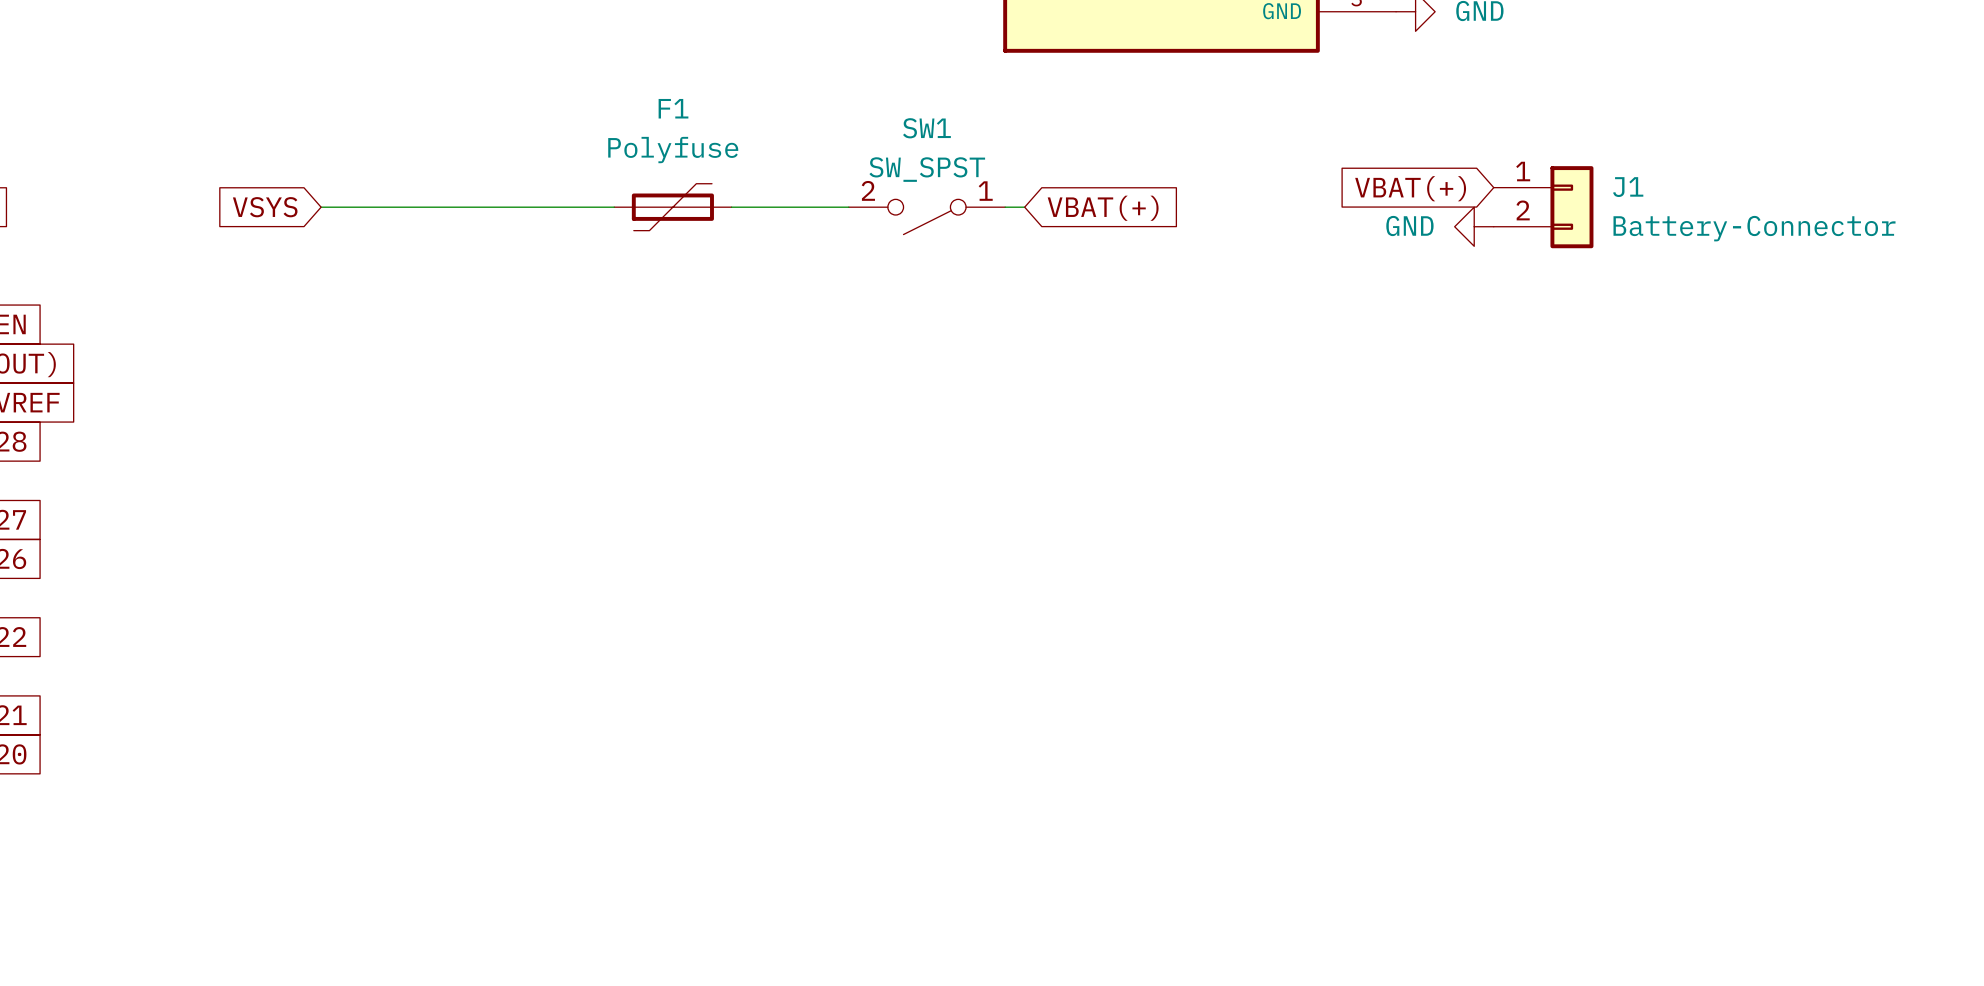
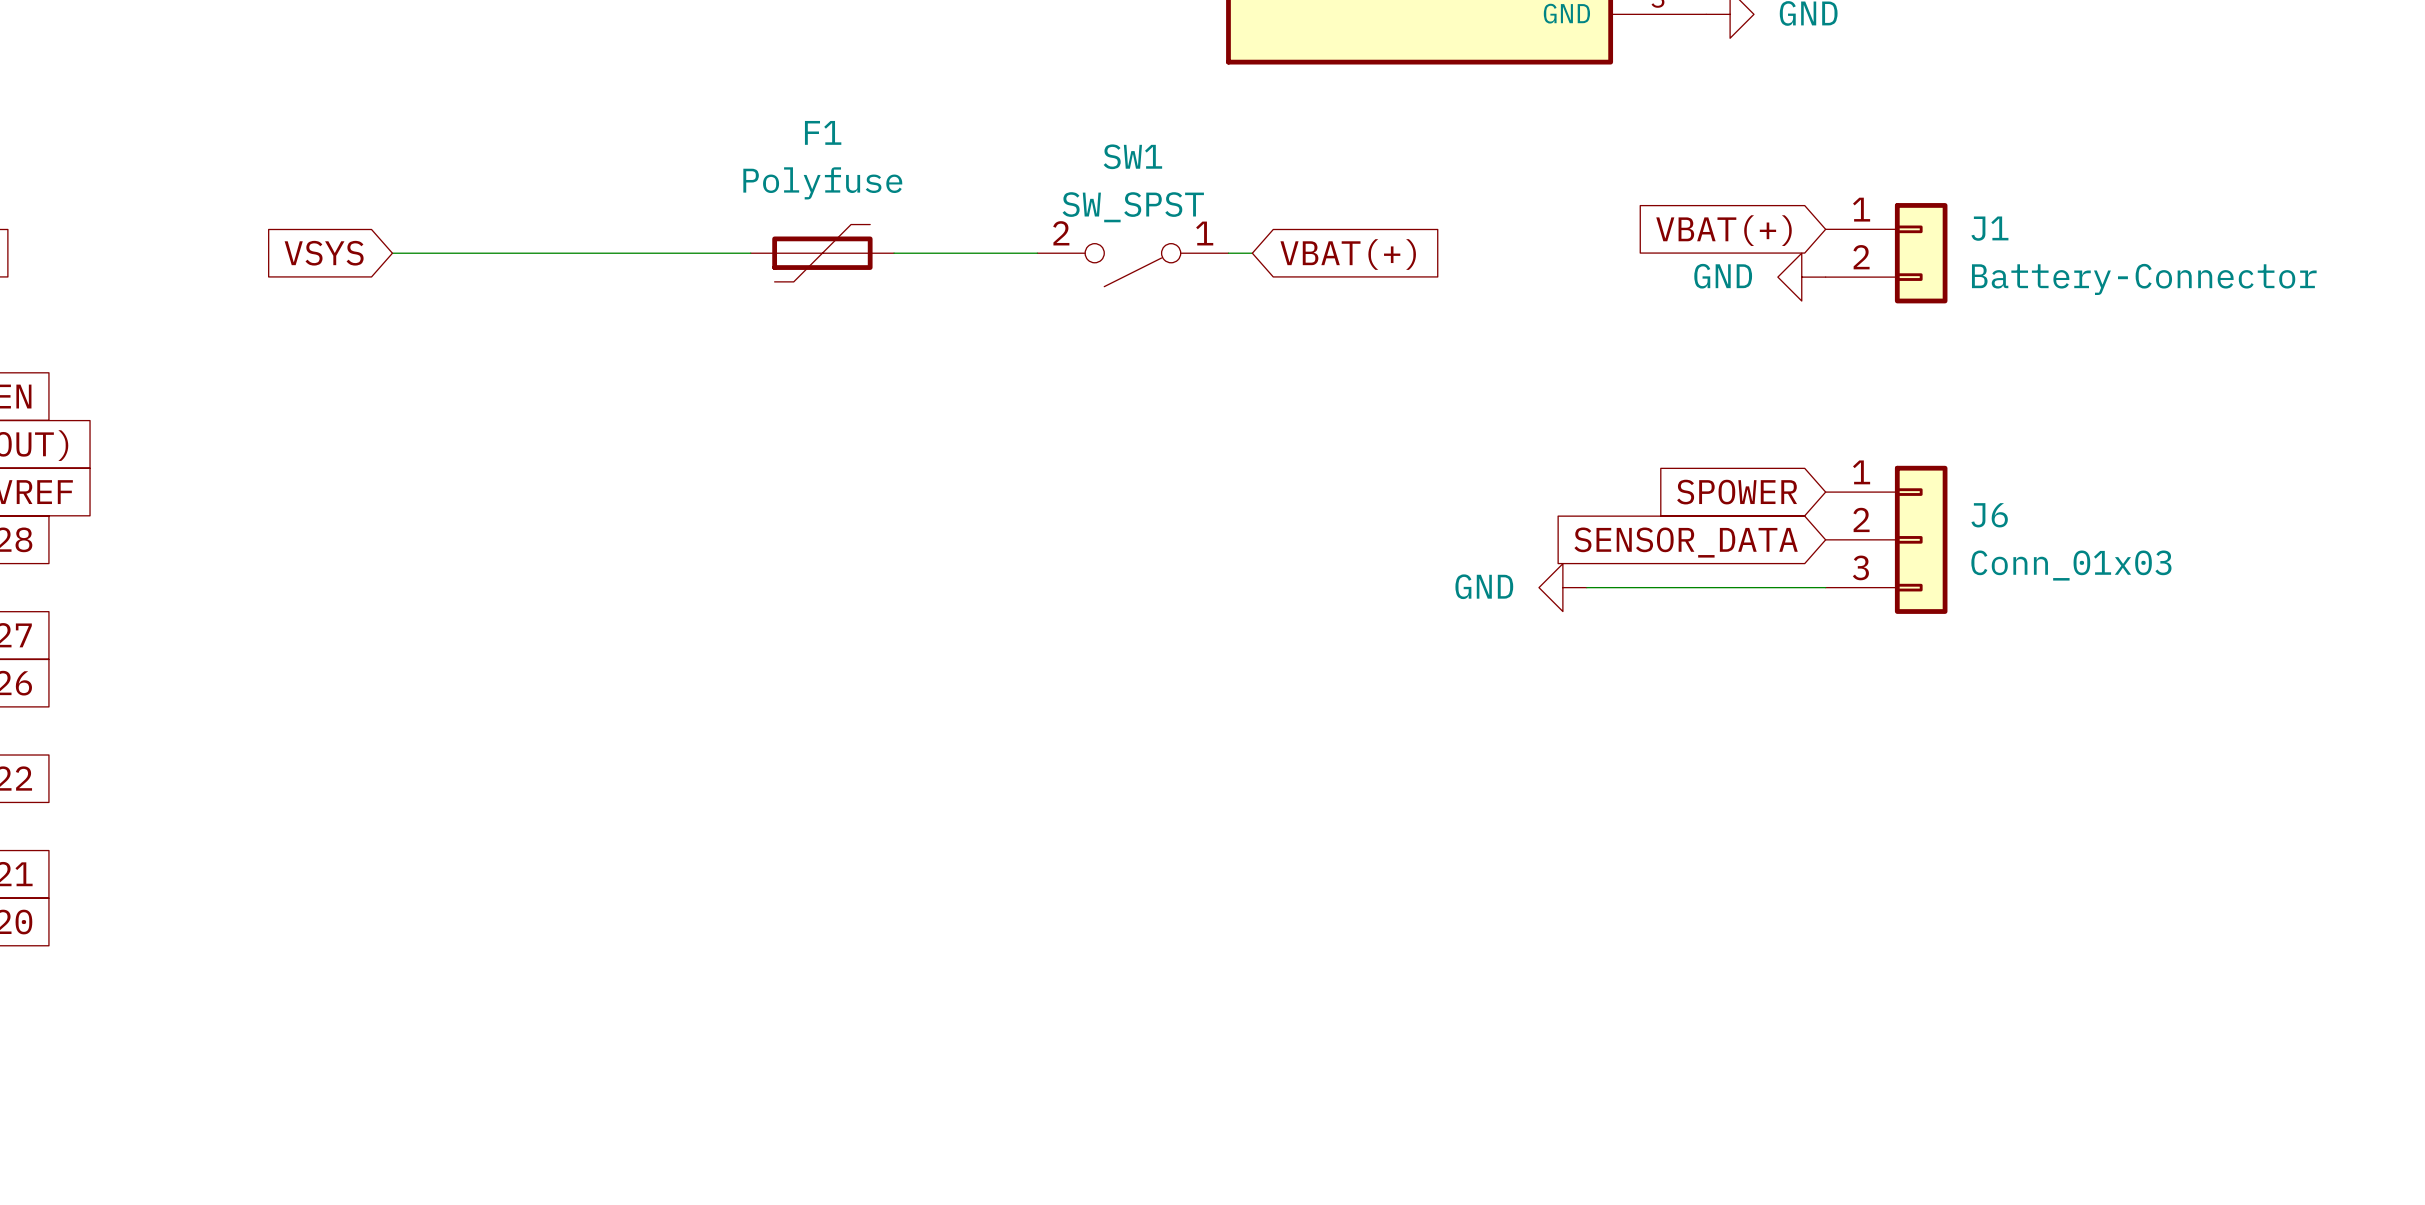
global label: none -> SPOWER (1737, 492)
J6: none -> Conn_01x03 (1886, 539)
global label: none -> SENSOR_DATA (1686, 542)
power symbol: none -> GND (1562, 587)
wire: none -> (1586, 587) (1825, 587)

